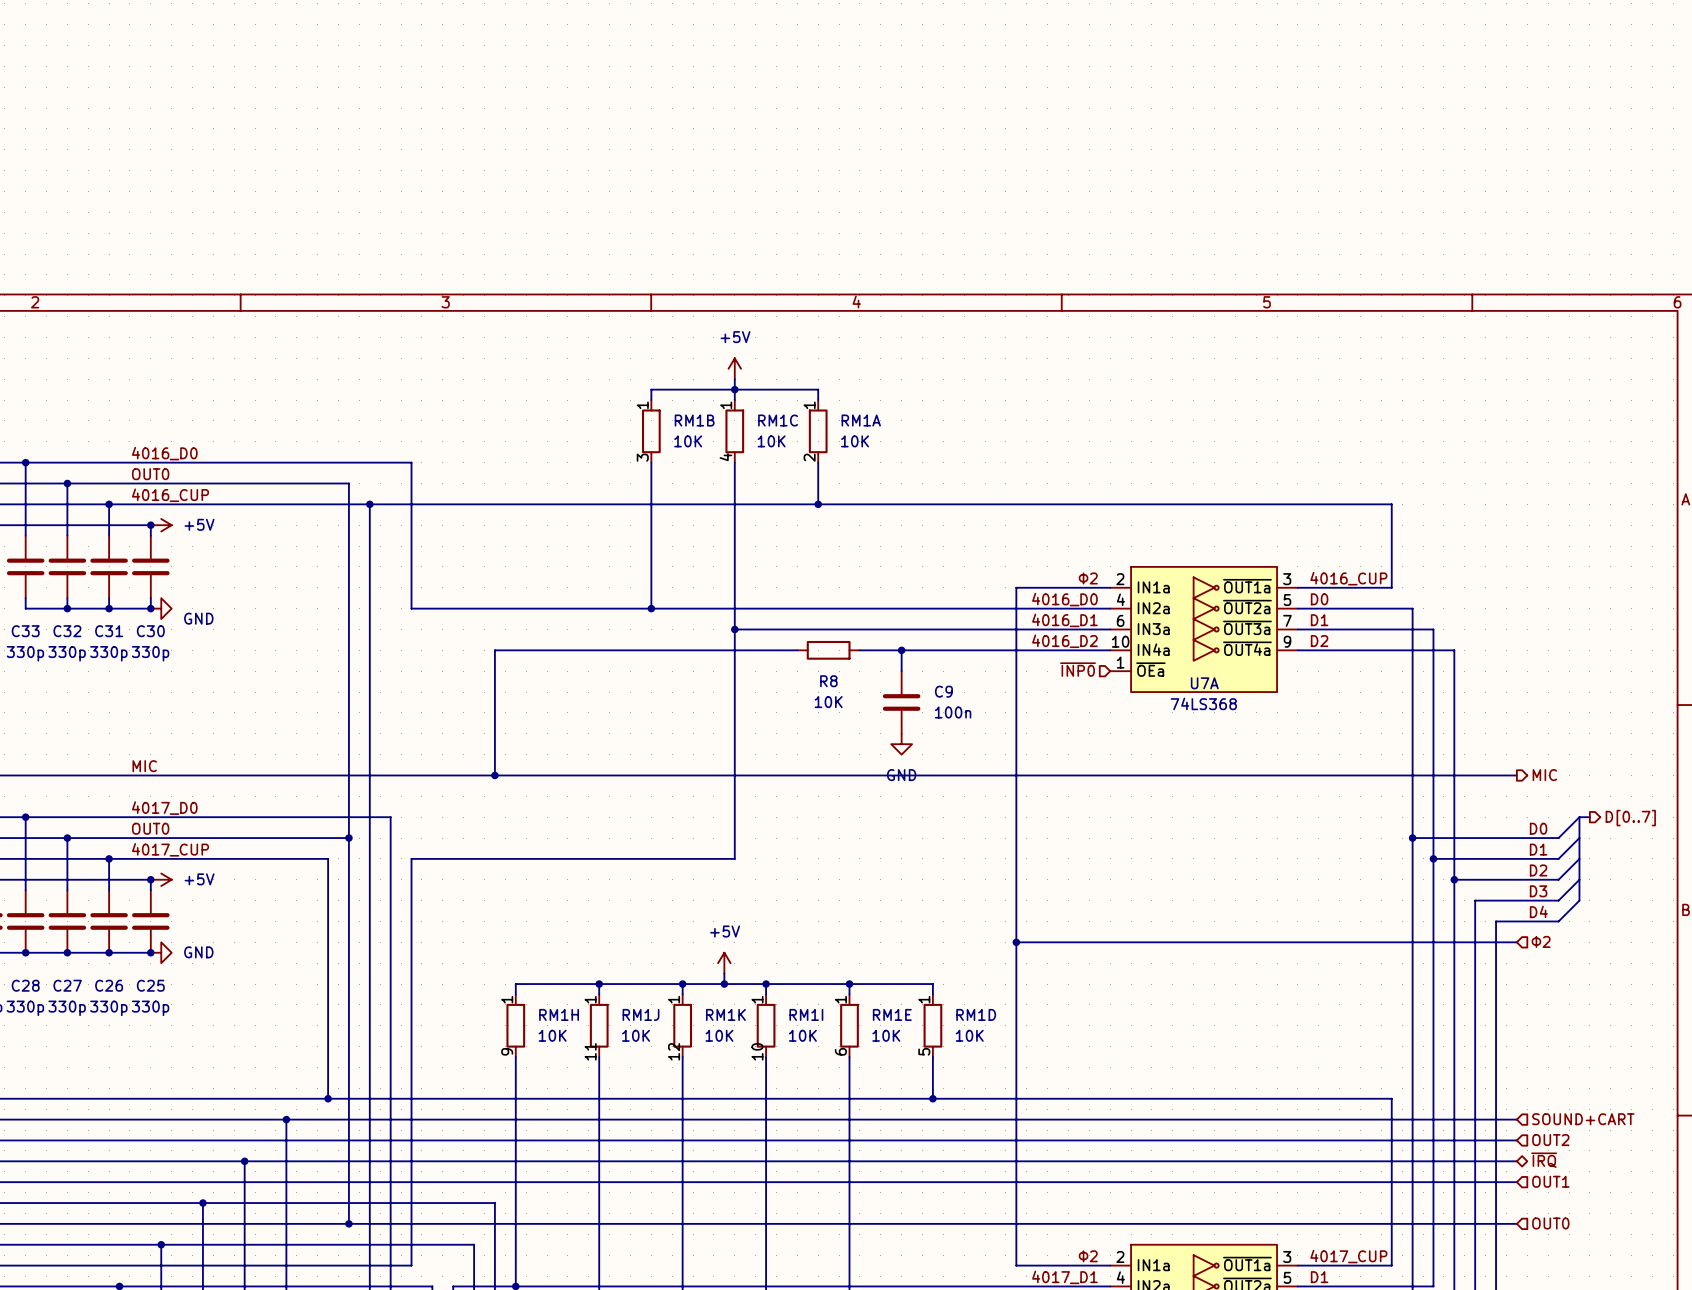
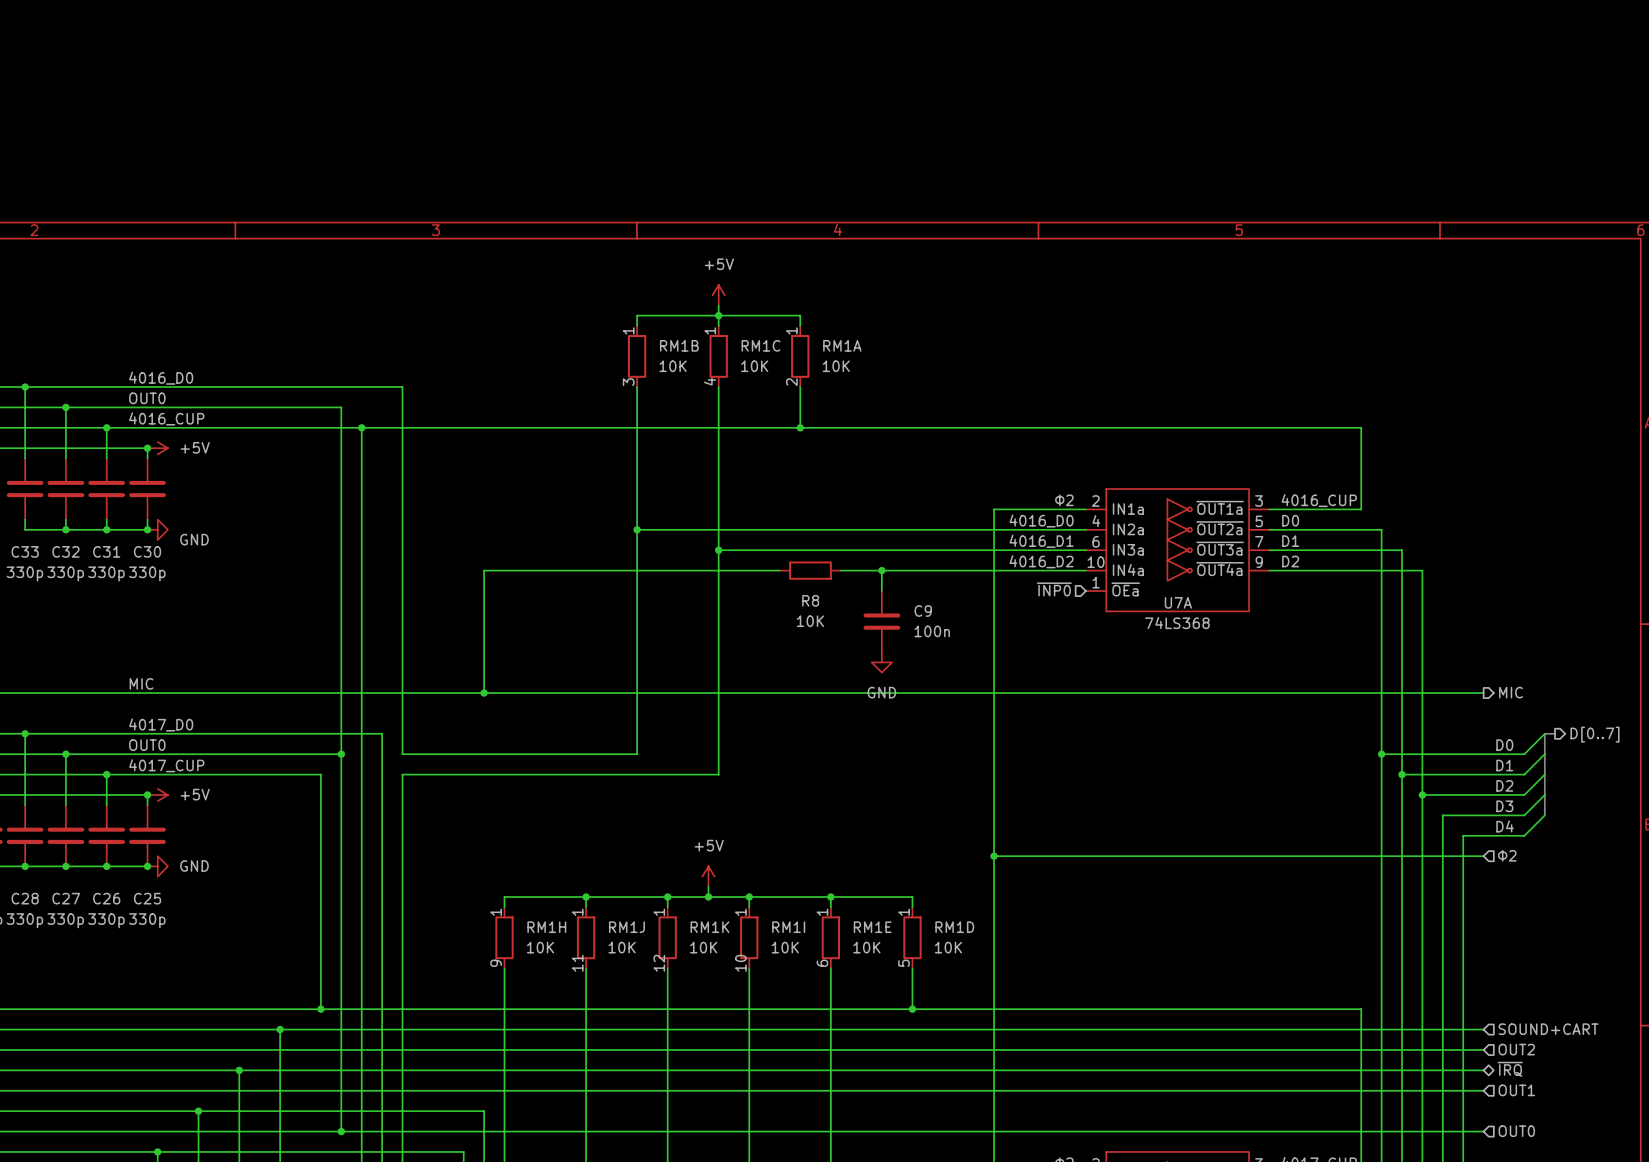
wire: (411, 608) (651, 608) -> (402, 529) (402, 754) (637, 754) (637, 529)

